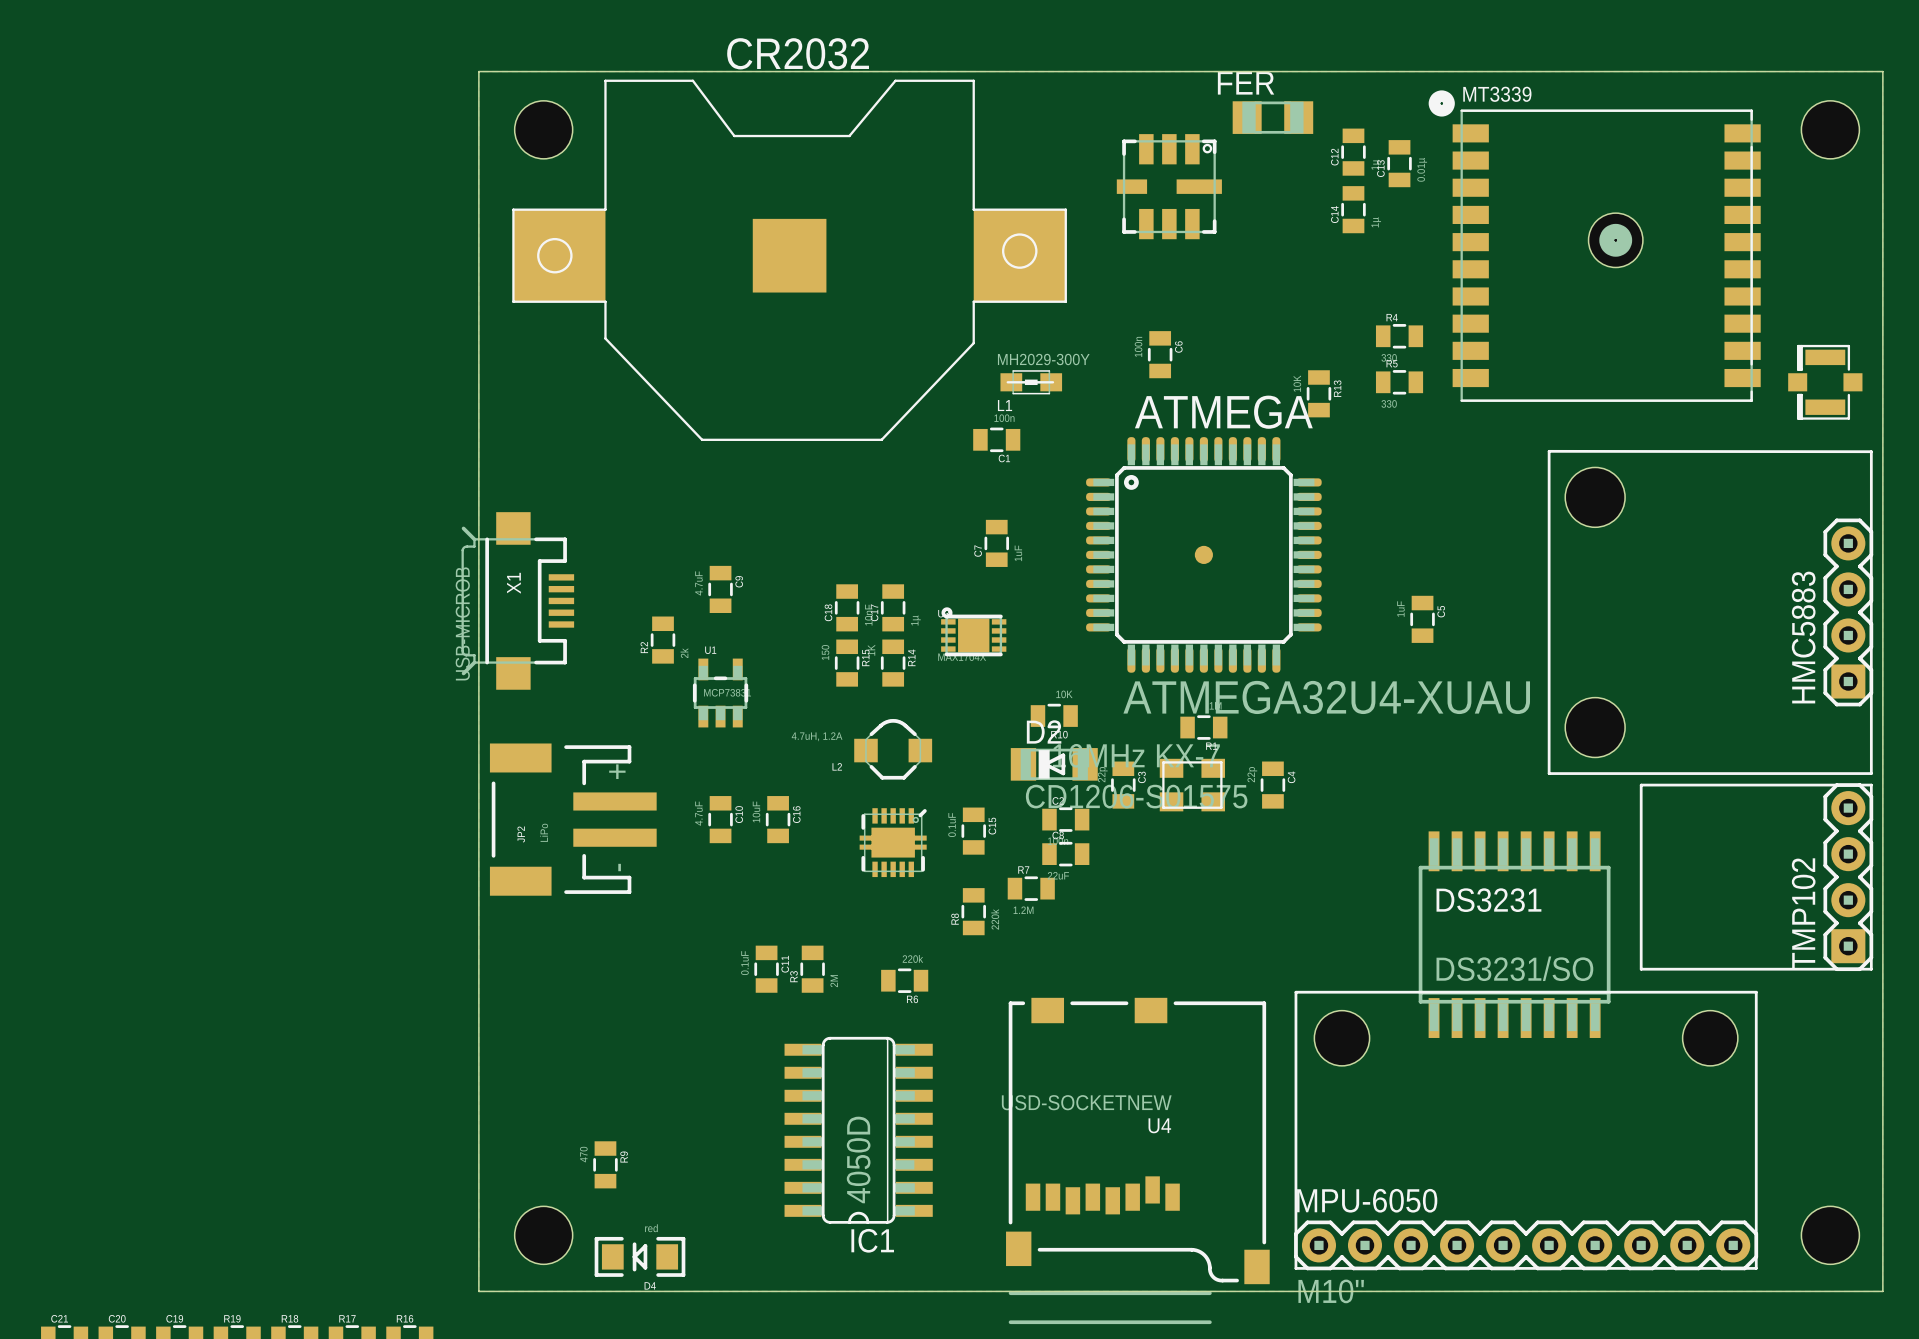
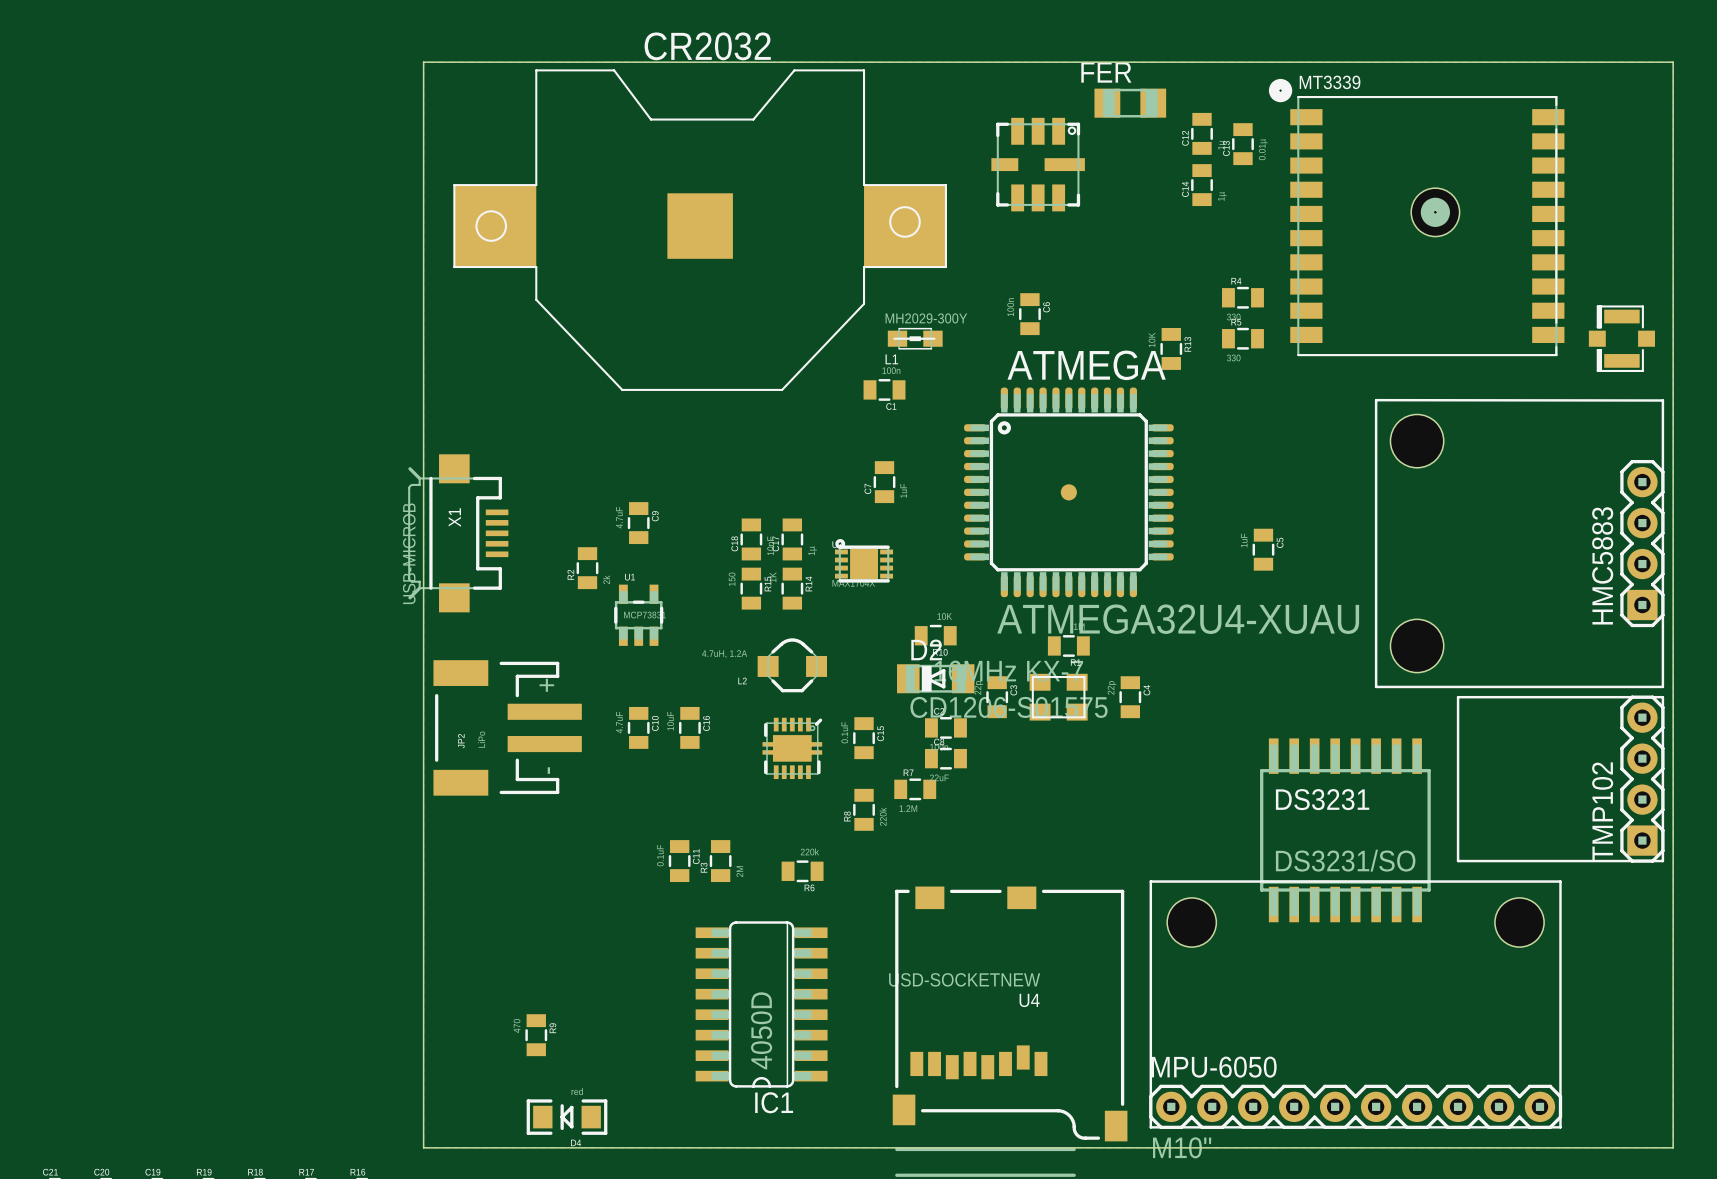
hole: (543, 129) -> none
hole: (1830, 129) -> none
hole: (543, 1235) -> none
hole: (1830, 1235) -> none

